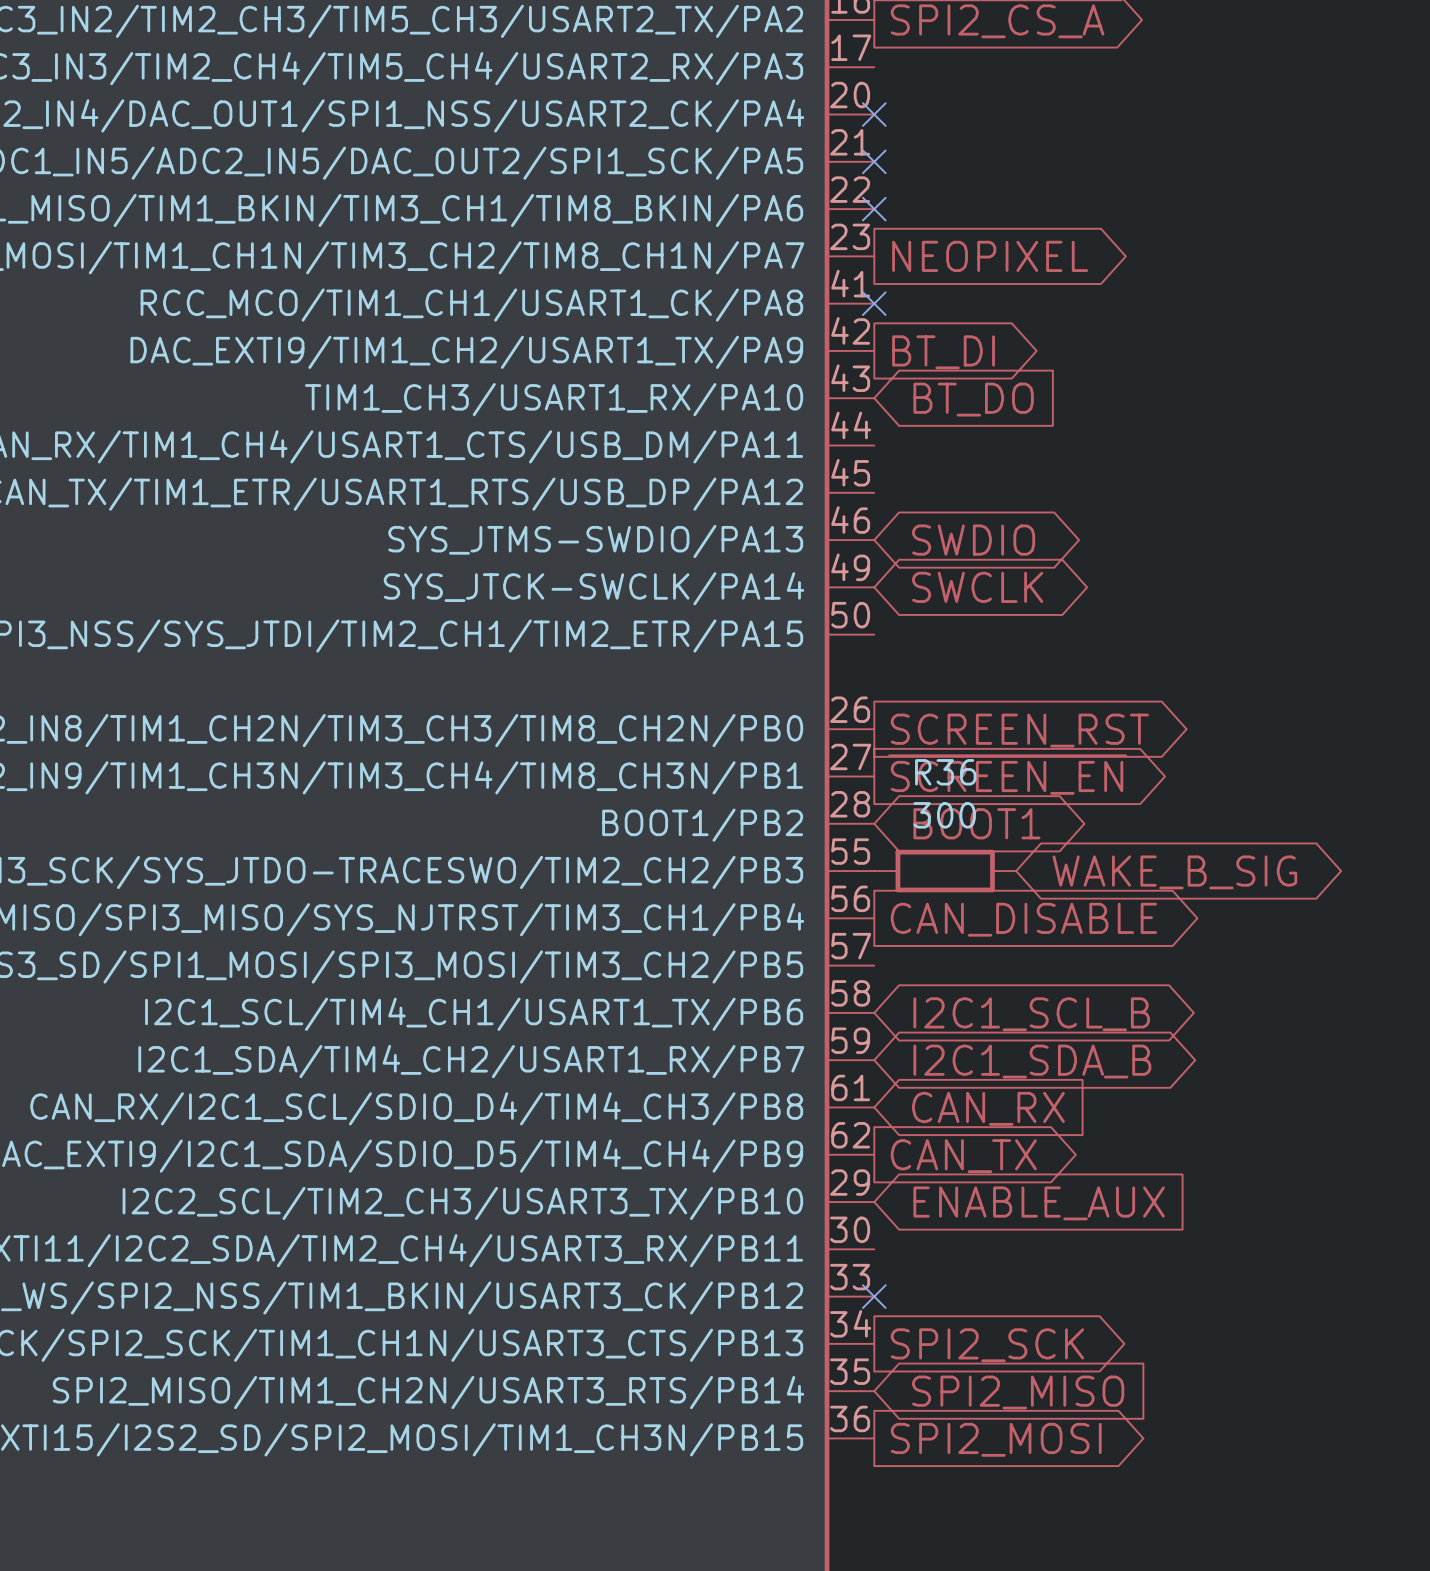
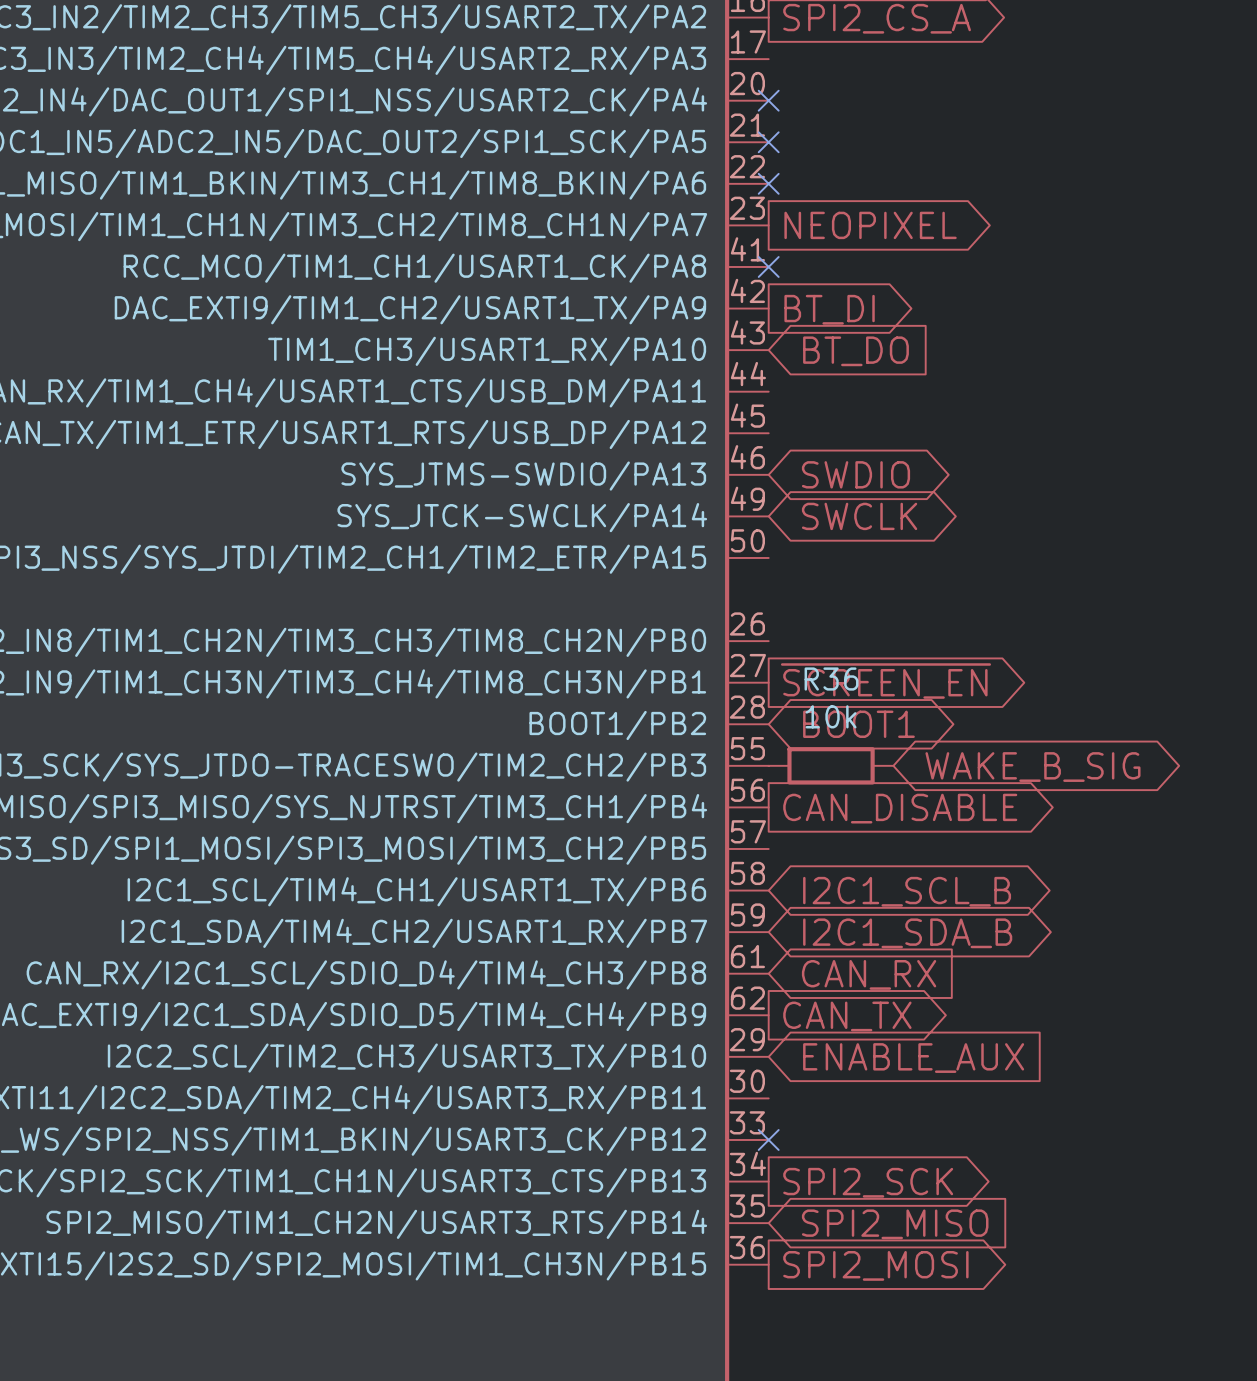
global label: SCREEN_RST (1019, 730) -> none
R36 value: 300 (944, 815) -> 10k (831, 716)

